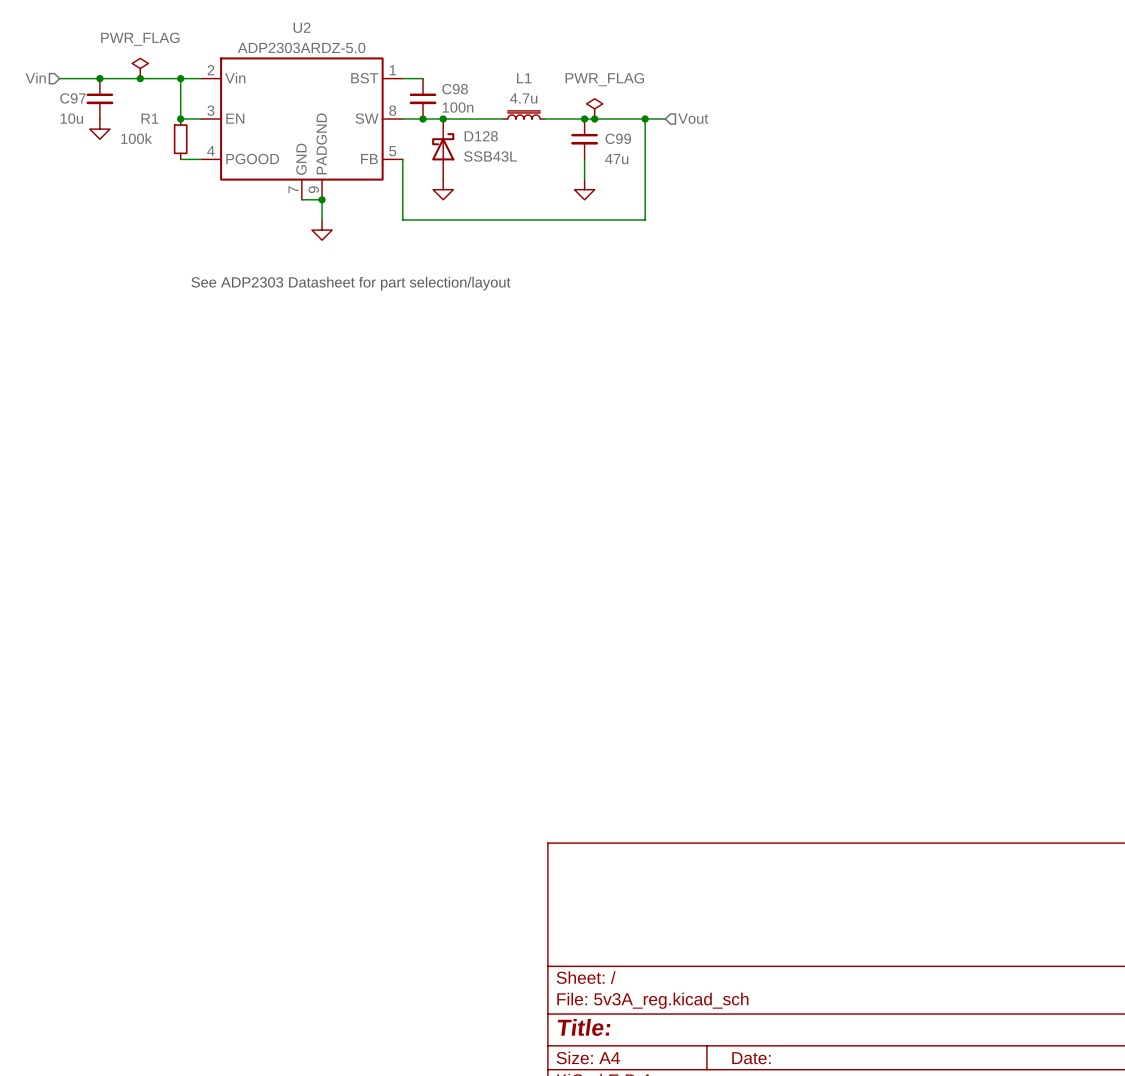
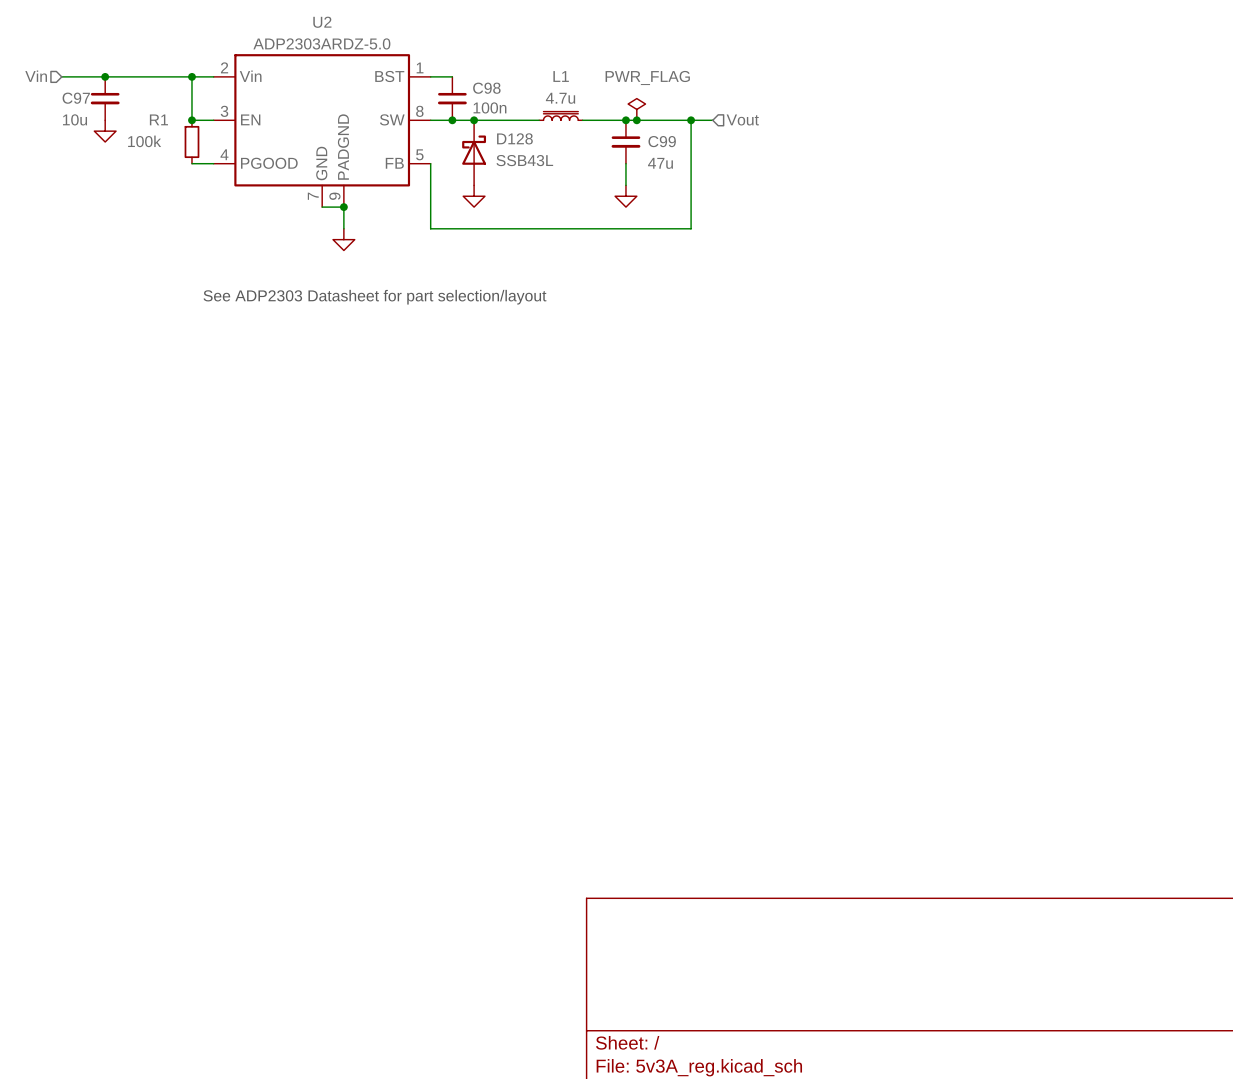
power symbol: PWR_FLAG (140, 68) -> none
junction: (140, 78) -> none

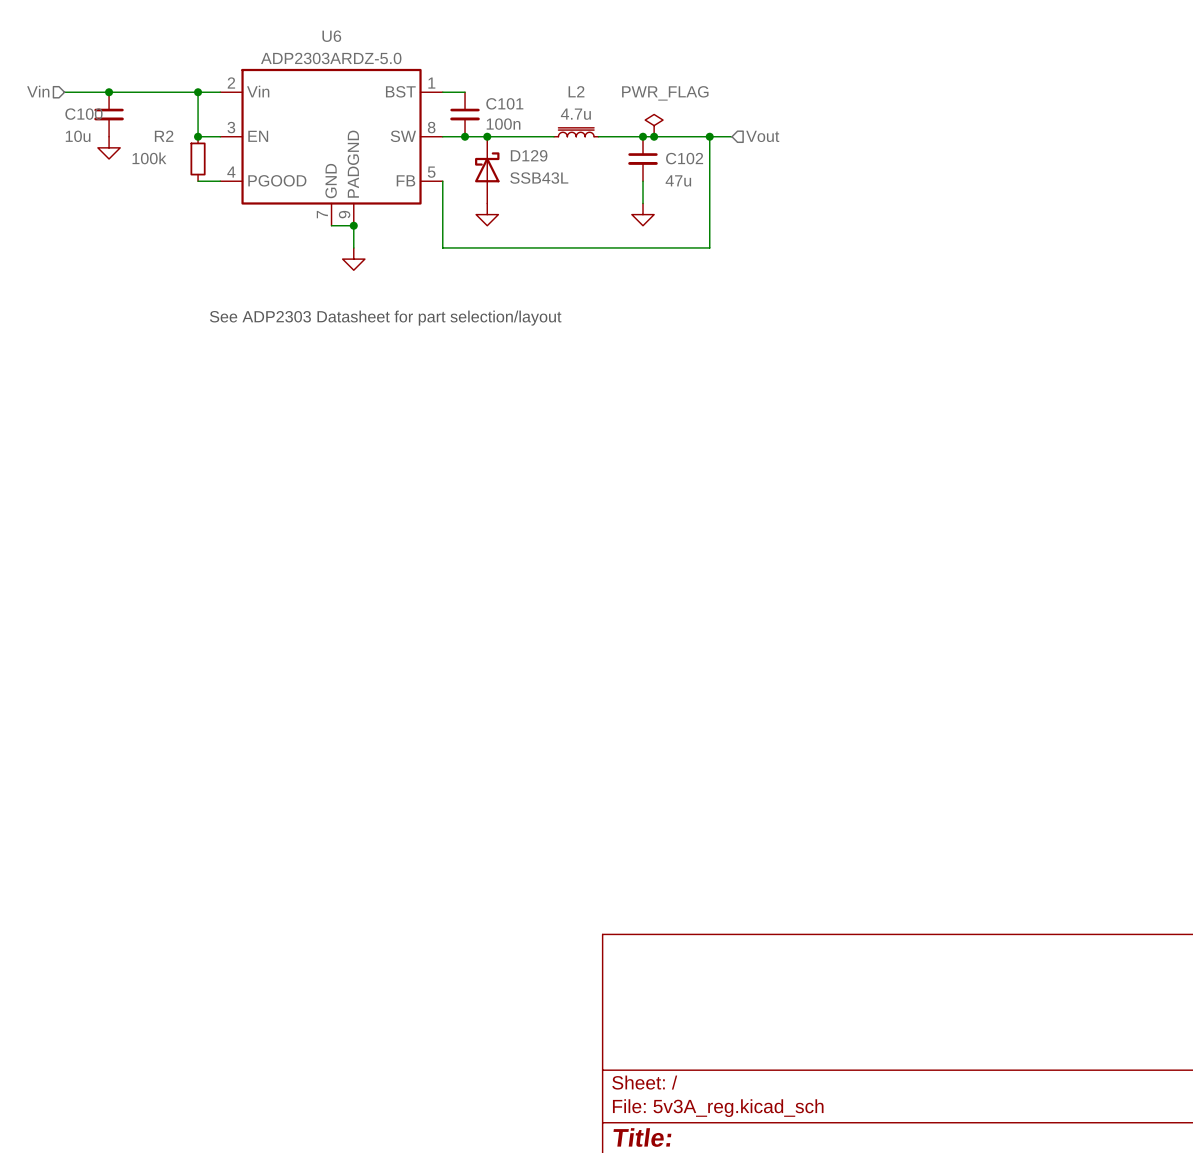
U2 name: U2 (322, 22) -> U6 (331, 36)
L1 name: L1 (561, 76) -> L2 (576, 91)
C98 name: C98 (486, 88) -> C101 (504, 103)
C97 name: C97 (76, 98) -> C100 (83, 114)
R1 name: R1 (158, 119) -> R2 (164, 136)
D128 name: D128 (514, 138) -> D129 (529, 155)
C99 name: C99 (662, 141) -> C102 (684, 158)

